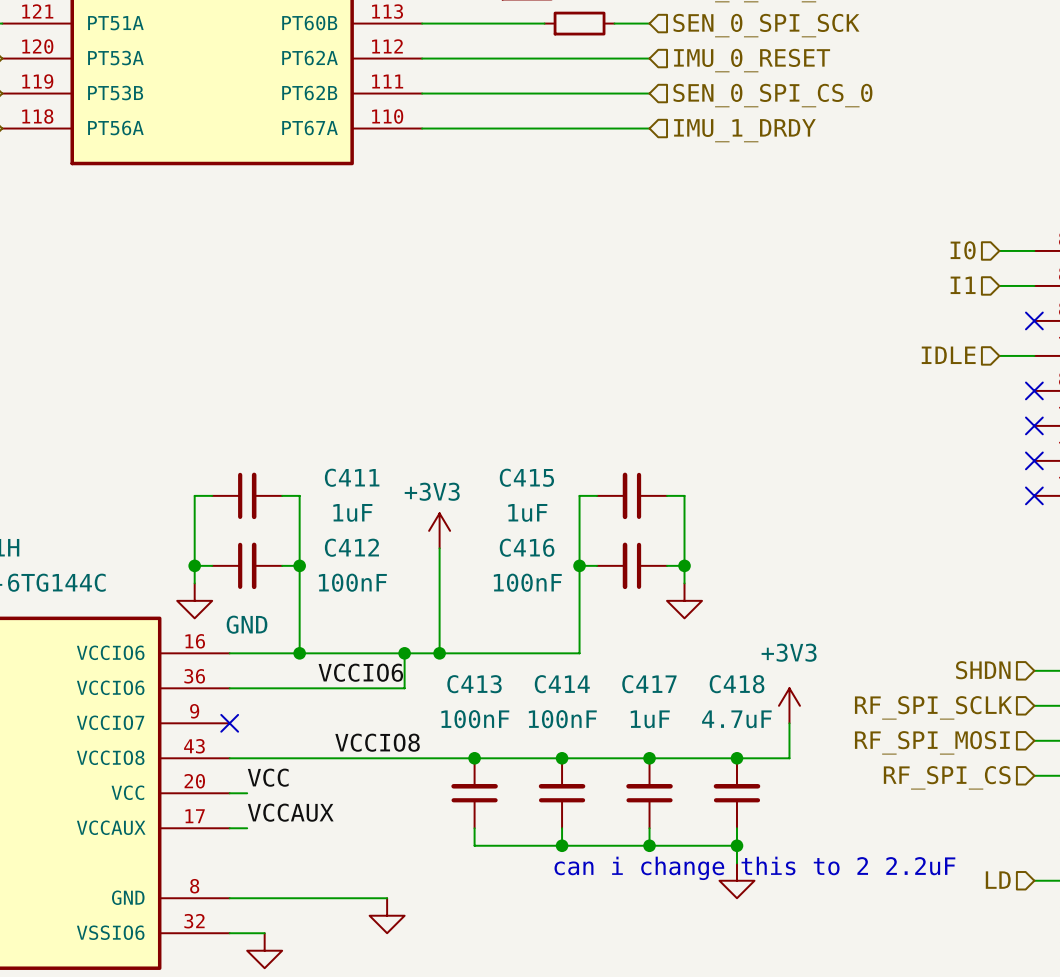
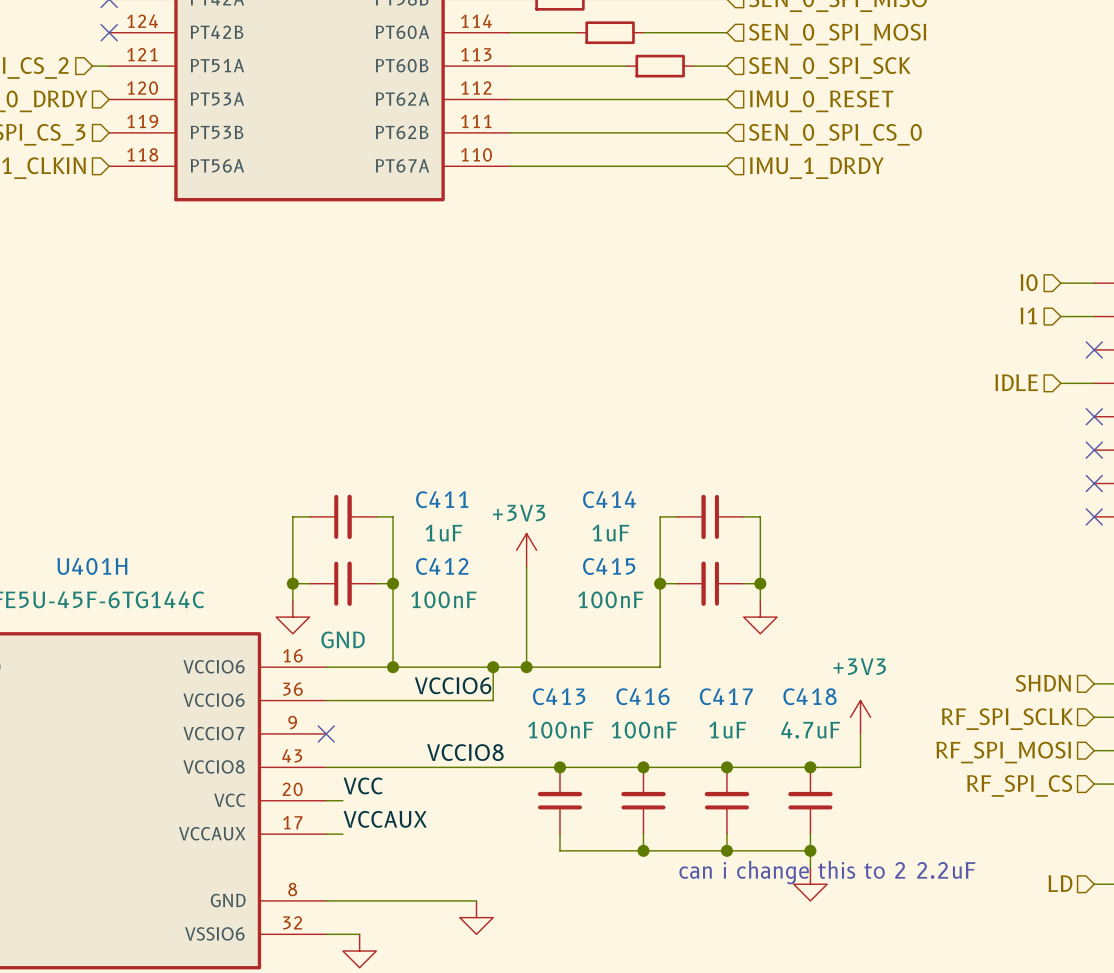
C415 name: C415 (526, 477) -> C414 (609, 499)
C416 name: C416 (527, 547) -> C415 (609, 566)
C414 name: C414 (562, 684) -> C416 (643, 696)

